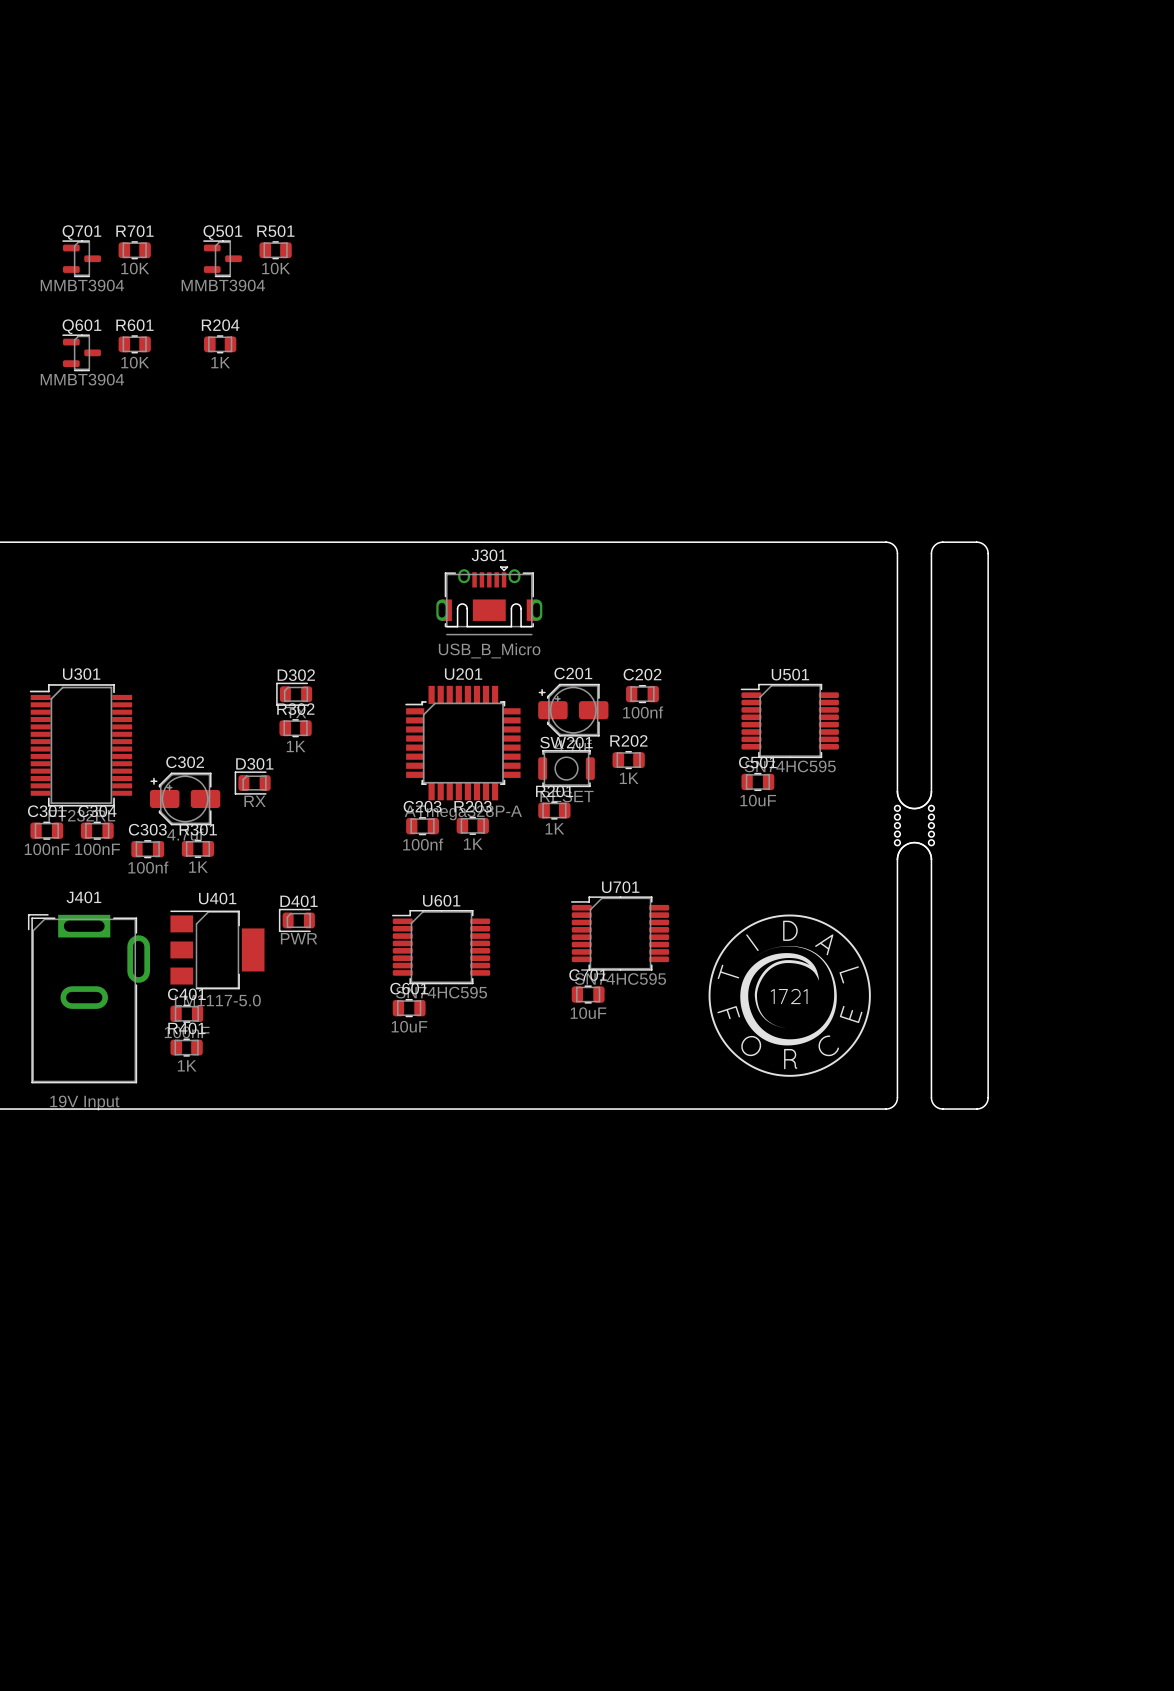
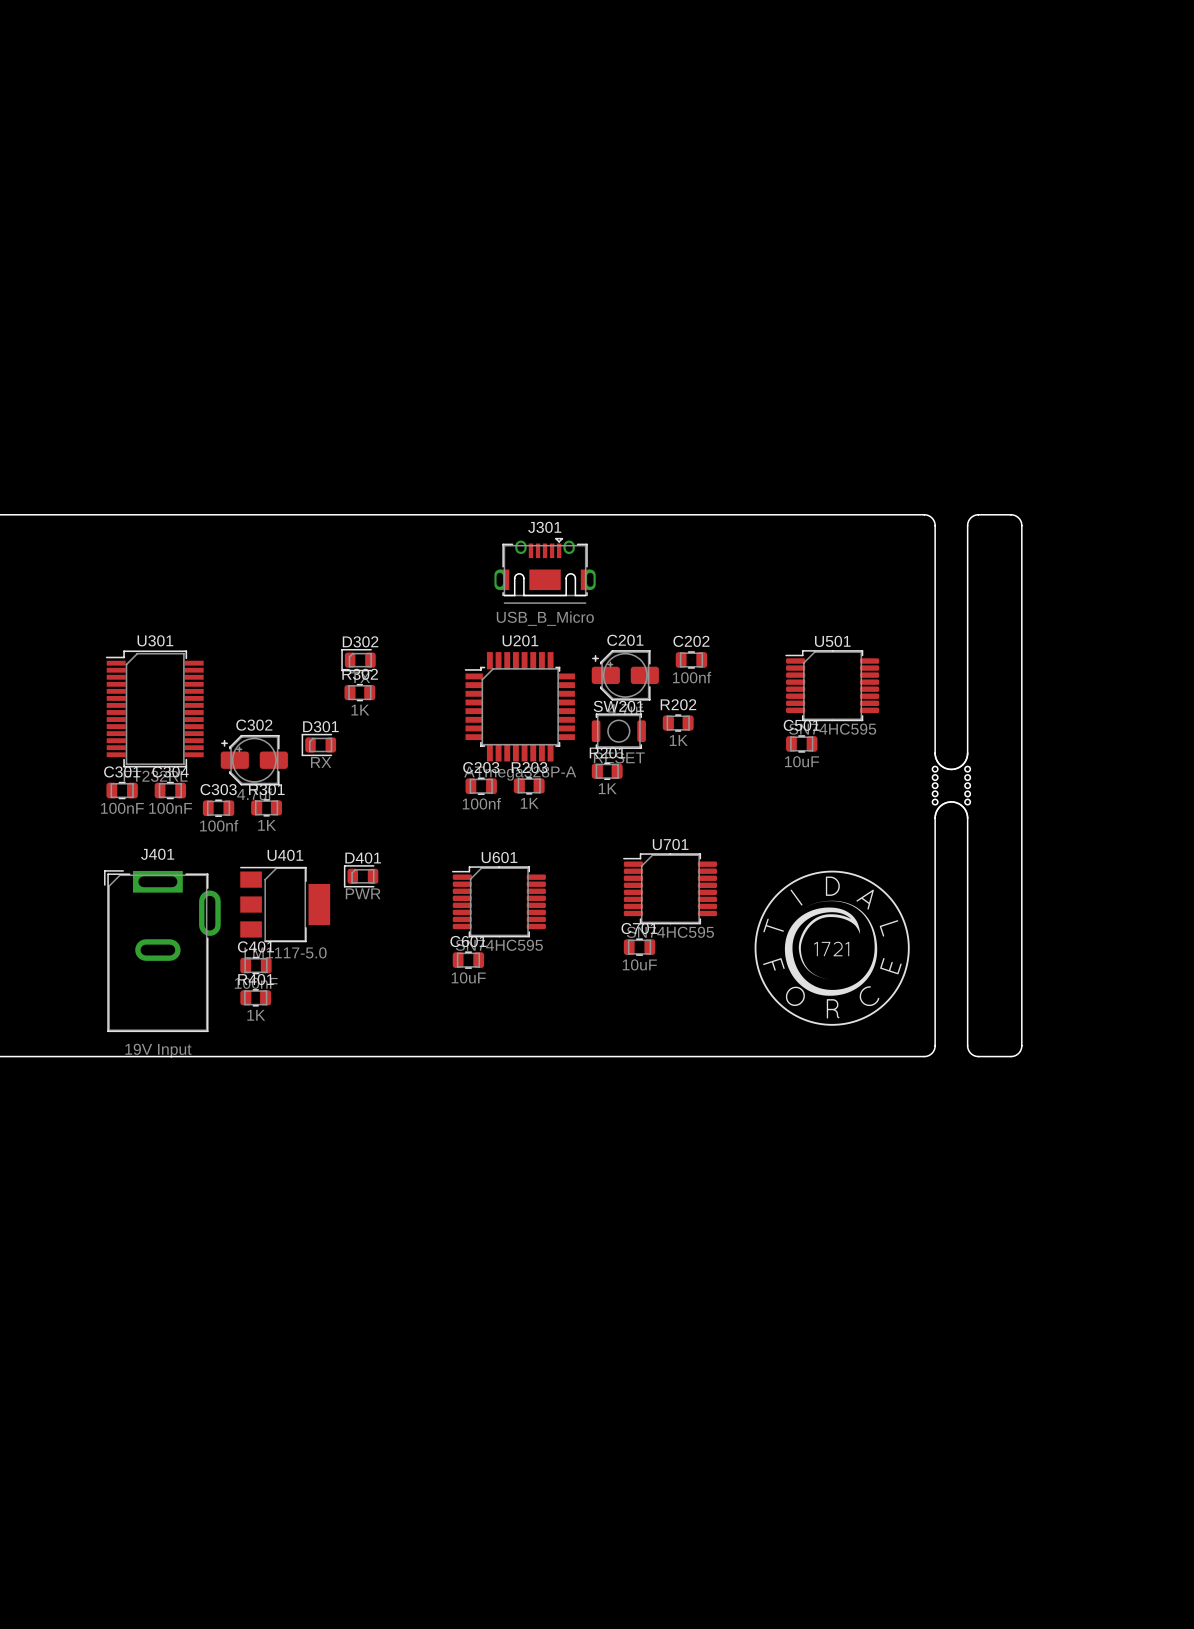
R701: 10K (134, 250) -> none
R501: 10K (275, 250) -> none
Q701: MMBT3904 (81, 258) -> none
Q501: MMBT3904 (222, 258) -> none
R601: 10K (134, 344) -> none
R204: 1K (220, 344) -> none
Q601: MMBT3904 (81, 352) -> none

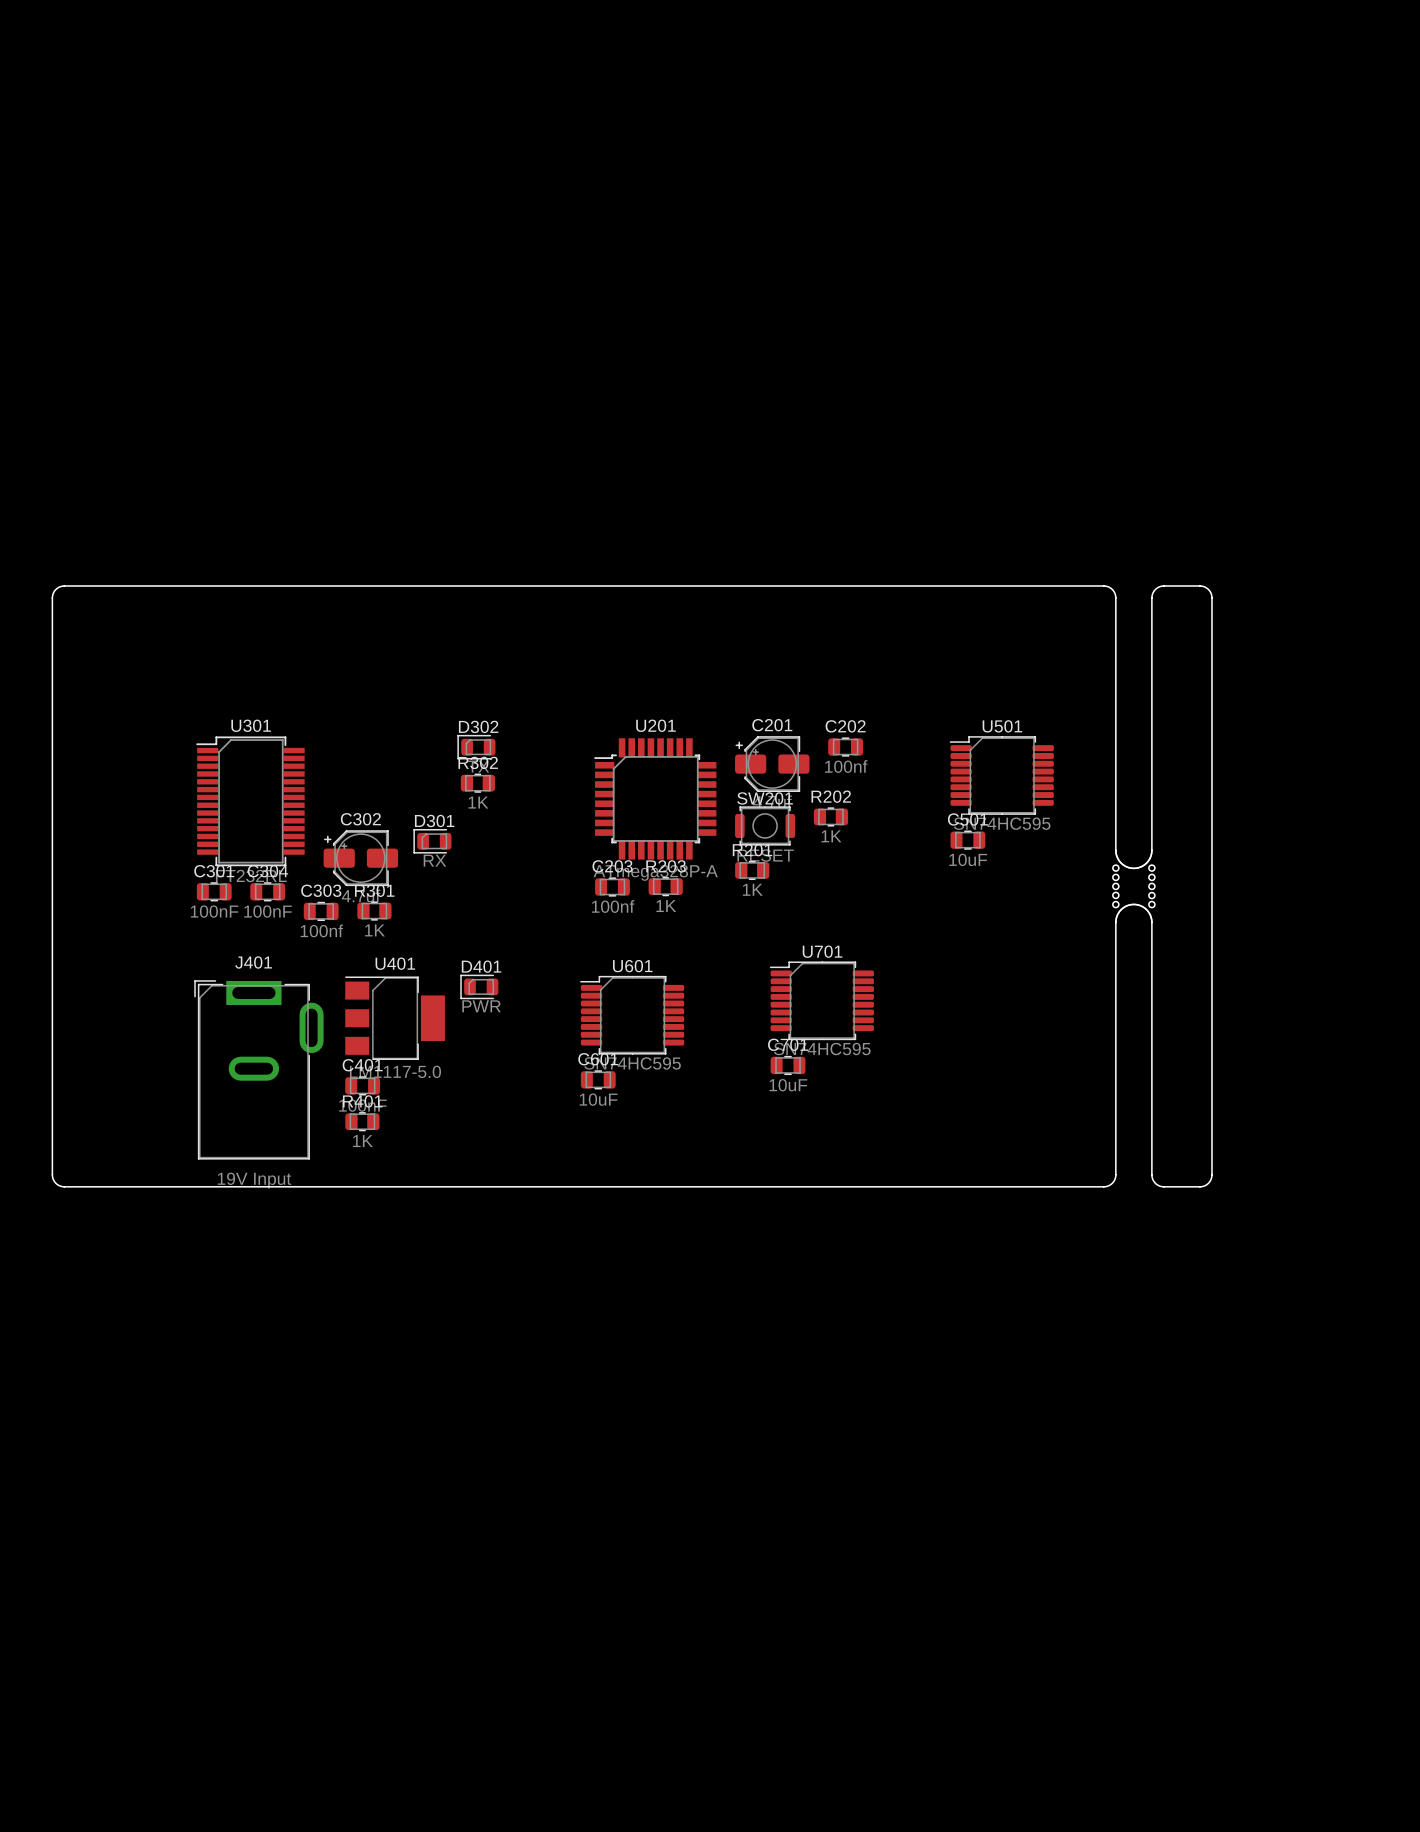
J301: USB_B_Micro (545, 570) -> none
drawing: [754, 870, 910, 1026] -> none

